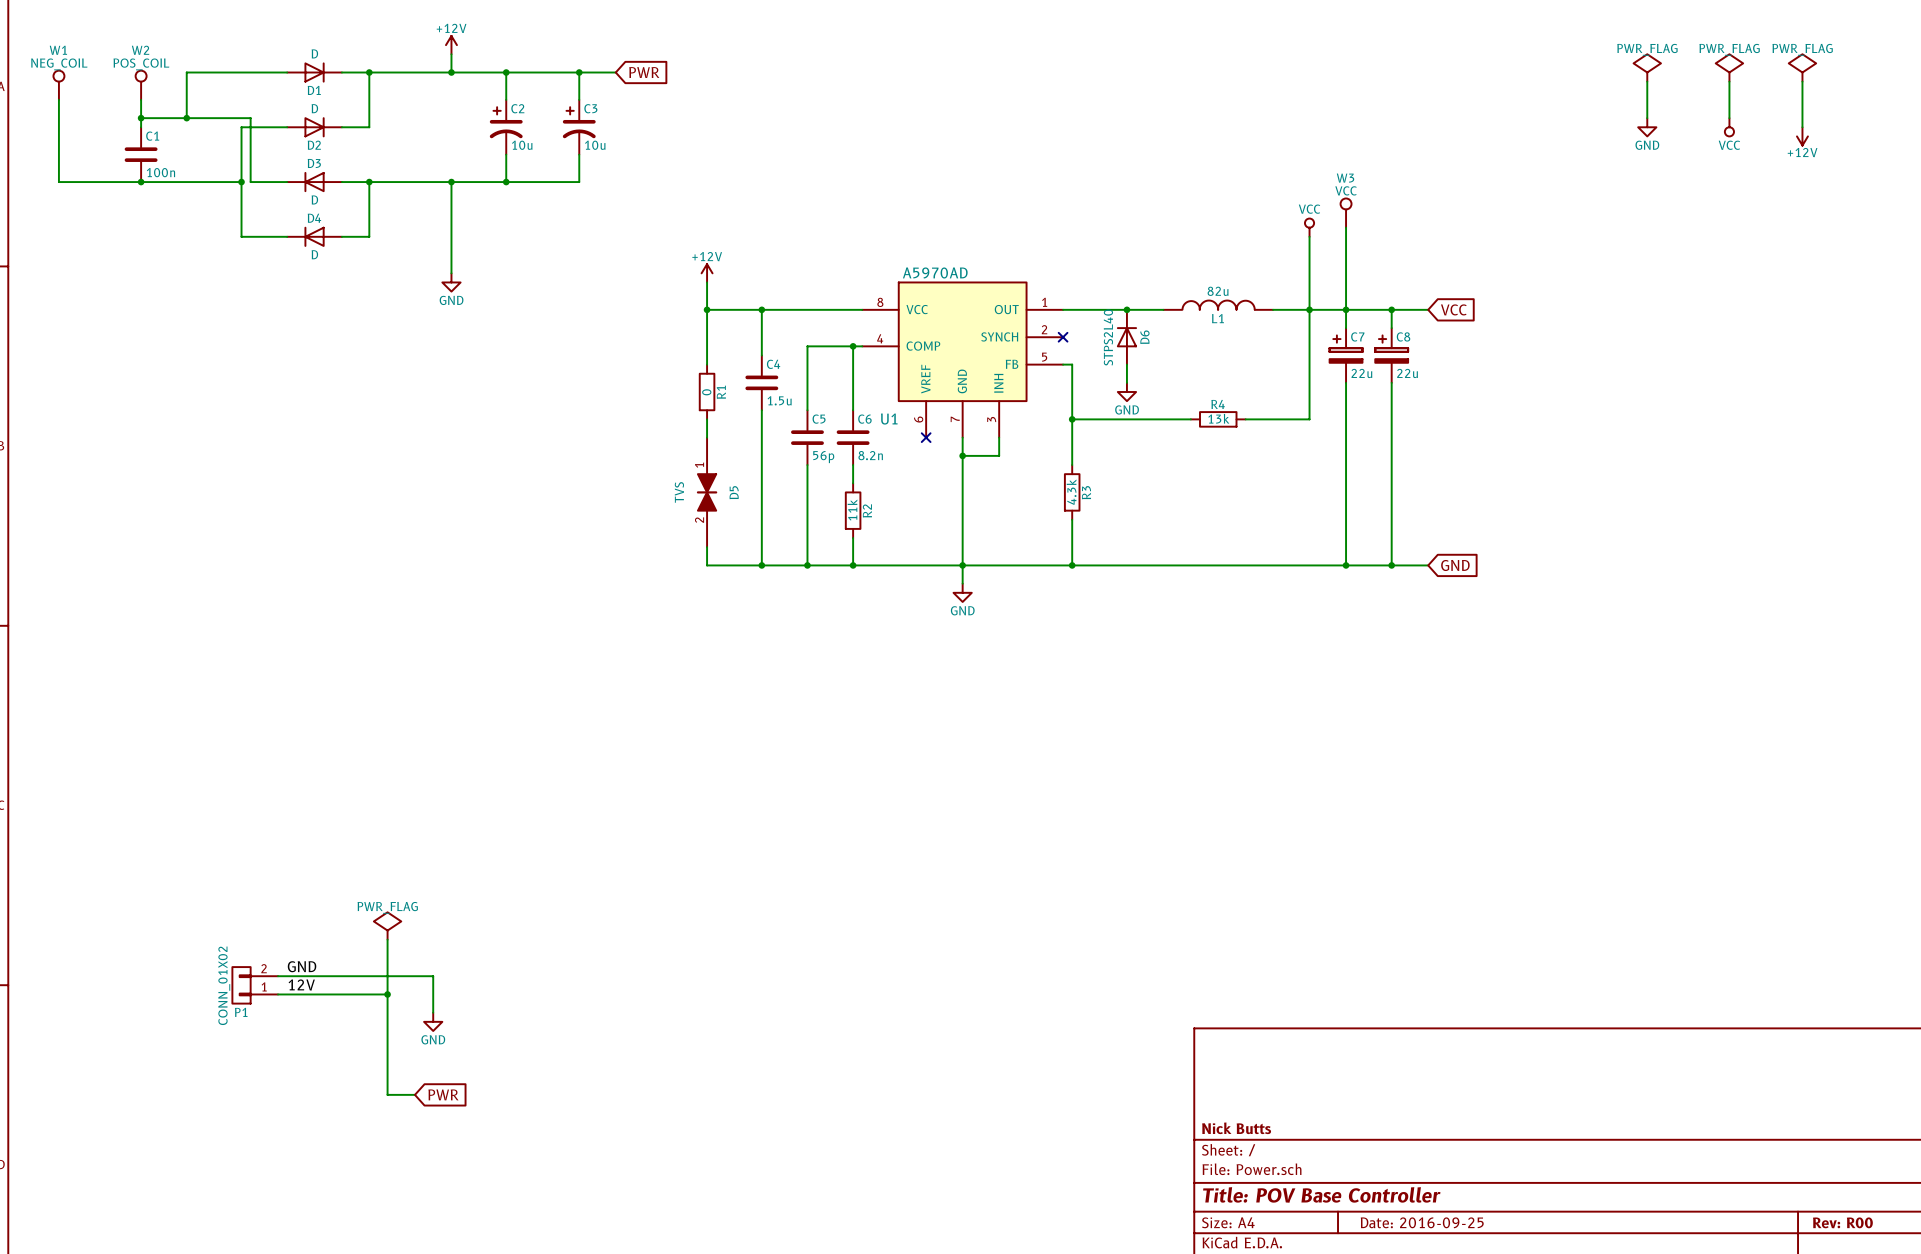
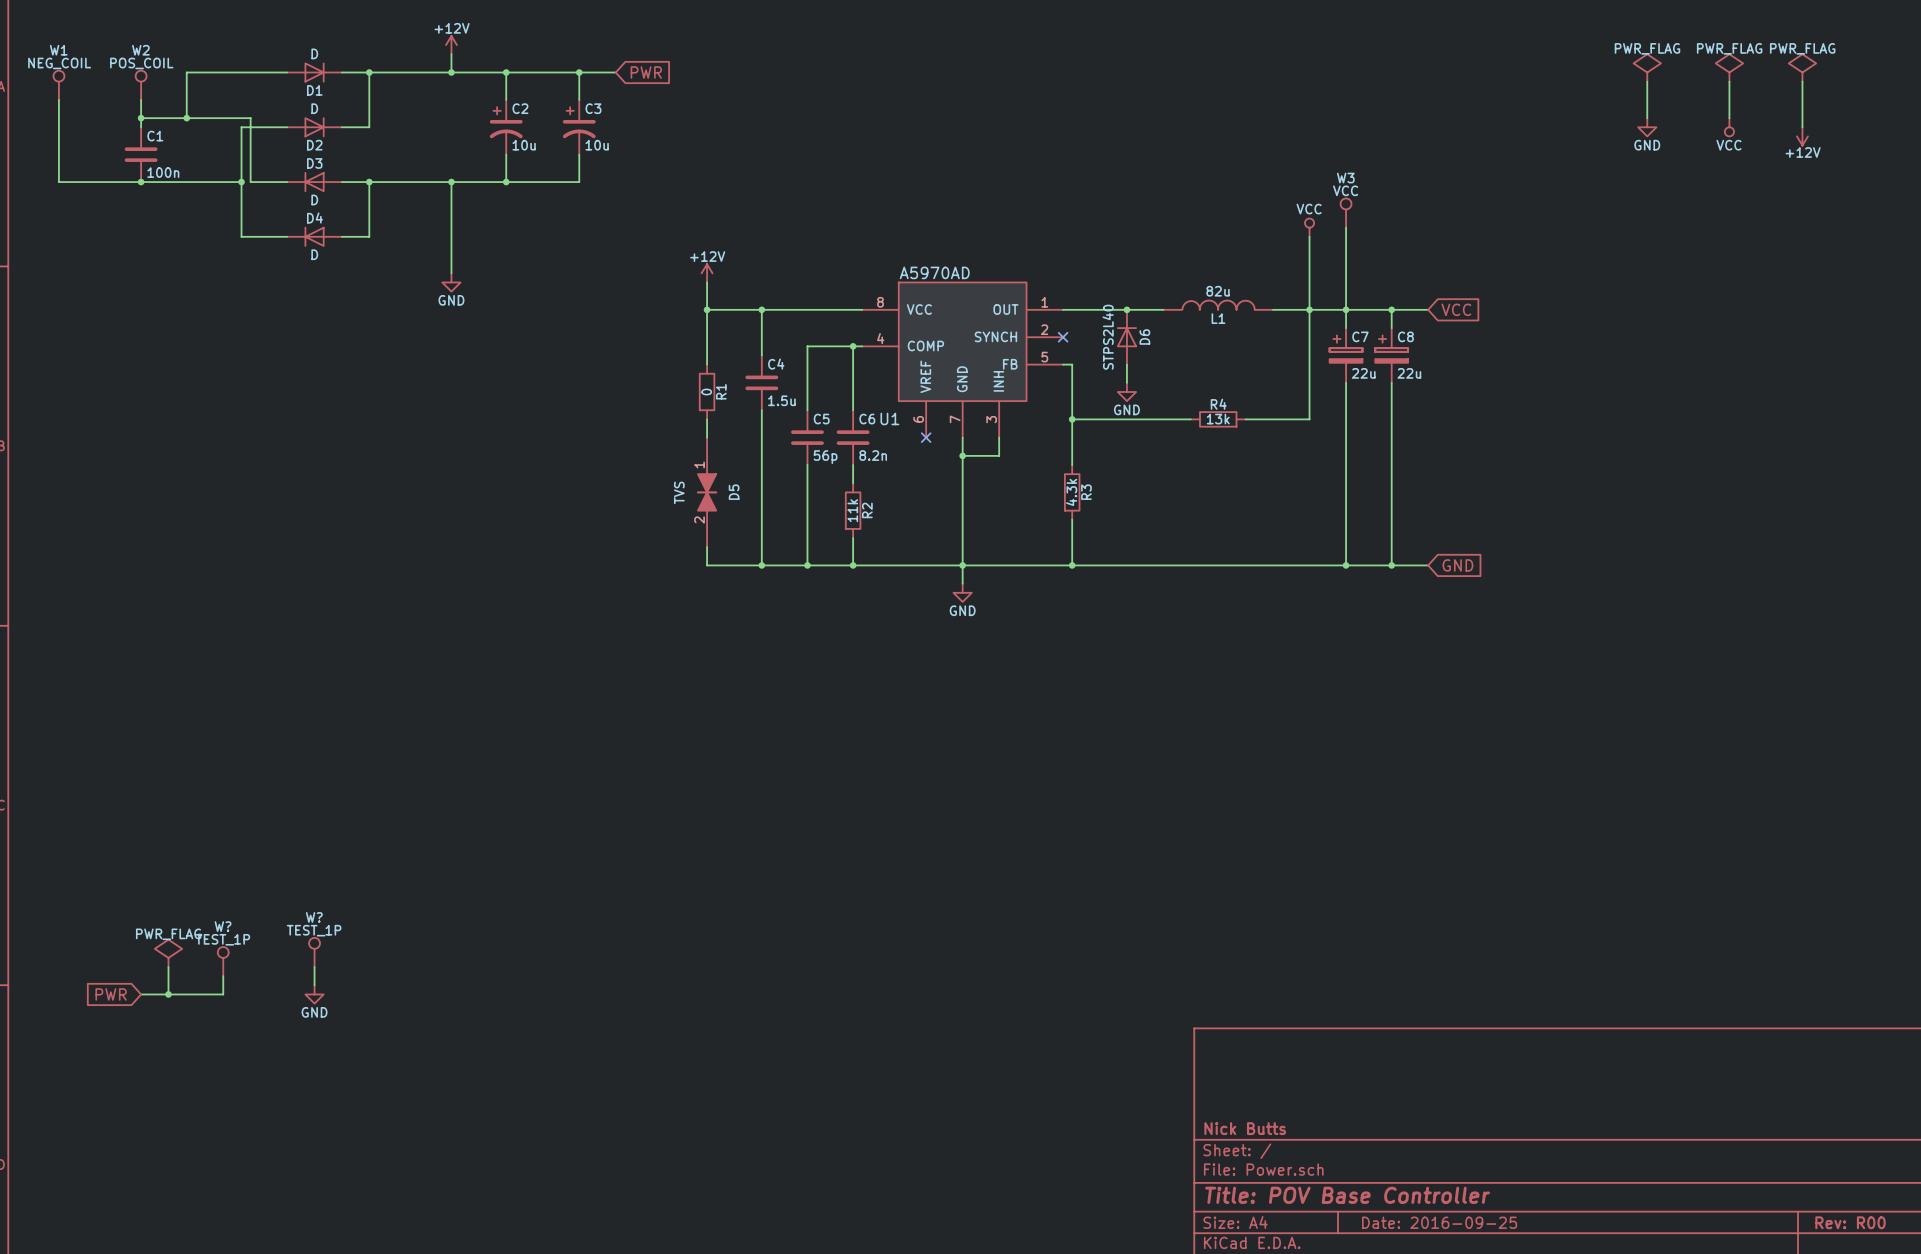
power symbol: PWR_FLAG (387, 926) -> none
wire: (387, 939) (387, 1094) (414, 1094) -> none
W?: none -> TEST_1P (314, 952)
power symbol: none -> PWR_FLAG (168, 953)
W?: none -> TEST_1P (223, 961)
label: GND (302, 966) -> none
wire: none -> (168, 967) (168, 994)
wire: none -> (314, 967) (314, 985)
wire: none -> (223, 976) (223, 994) (141, 994)
wire: (278, 976) (433, 976) (433, 1012) -> none
label: 12V (301, 984) -> none
P1: CONN_01X02 (255, 985) -> none
global label: none -> PWR (111, 994)
junction: none -> (168, 994)
wire: (278, 994) (387, 994) -> none
junction: (387, 994) -> none
power symbol position: GND (433, 1021) -> GND (314, 994)
global label: PWR (443, 1094) -> none

